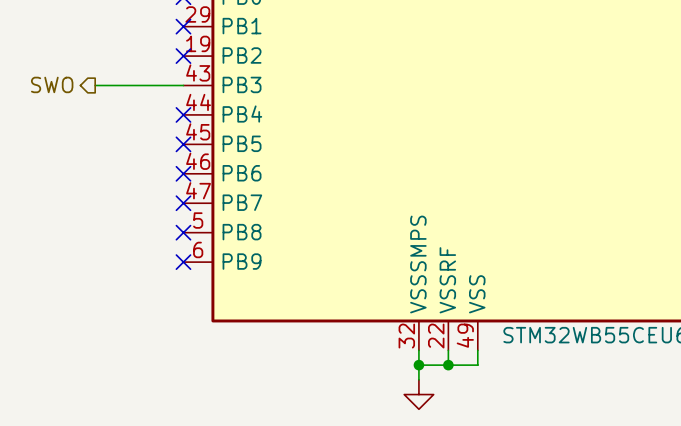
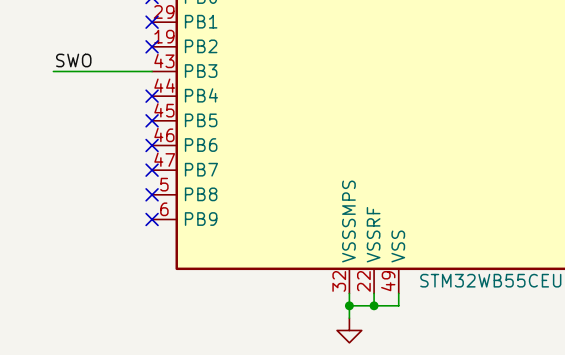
label: none -> SWO (73, 60)
hierarchical label: SWO (52, 84) -> none
wire: none -> (53, 71) (78, 71)

